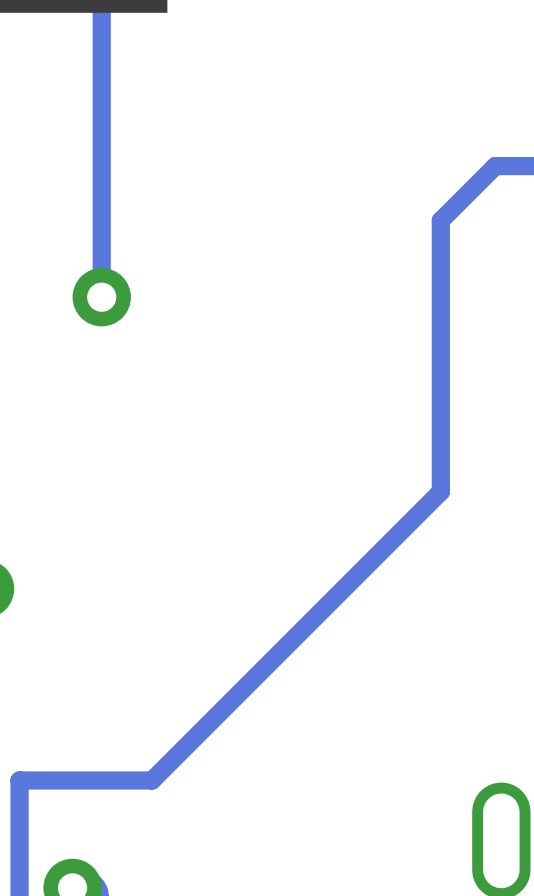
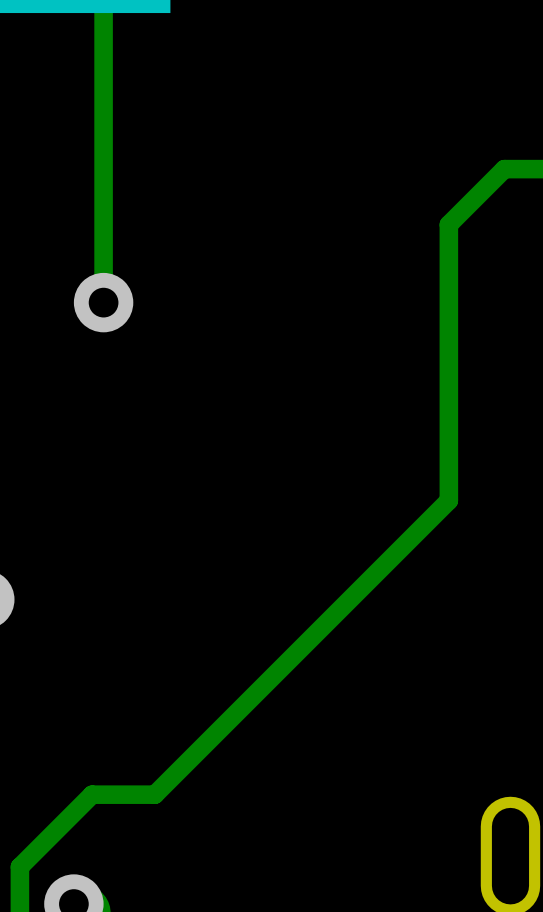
track: (90, 780) (19, 780) (19, 851) -> (92, 794) (19, 866)

